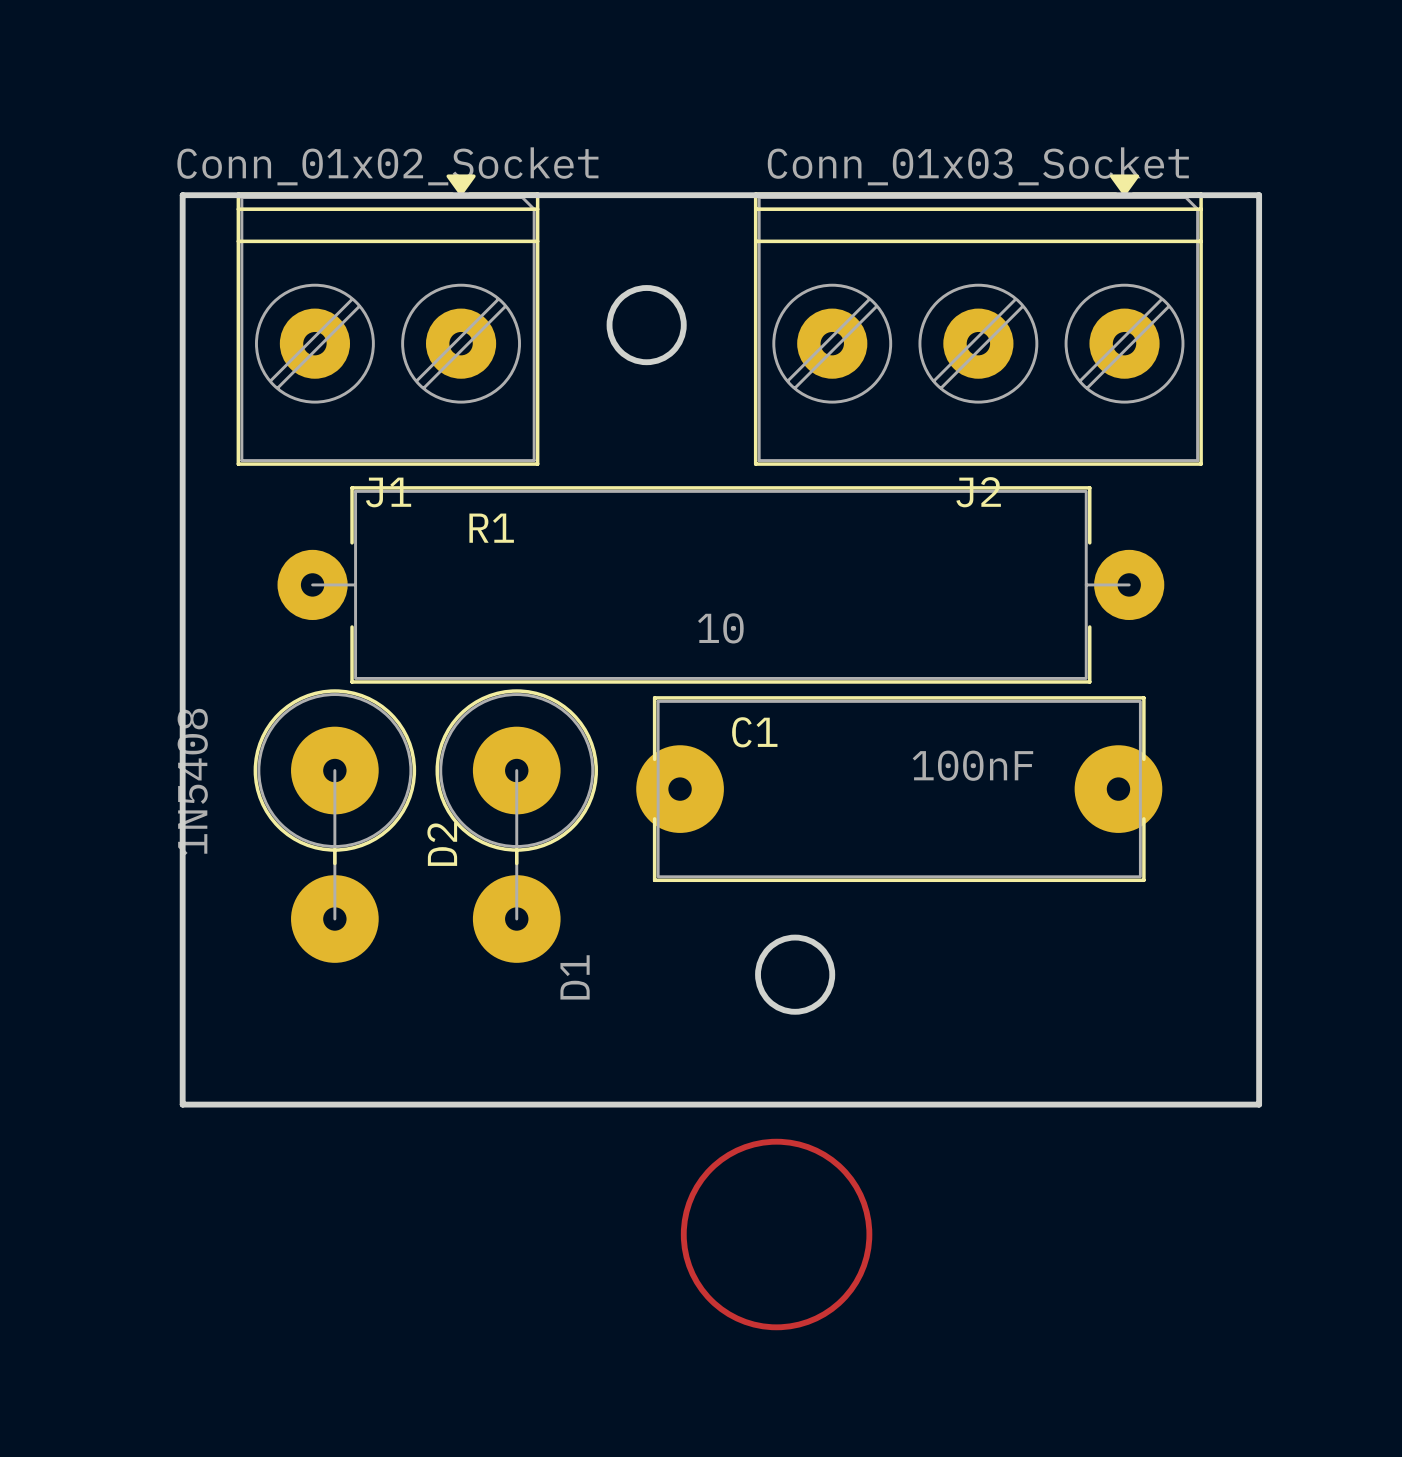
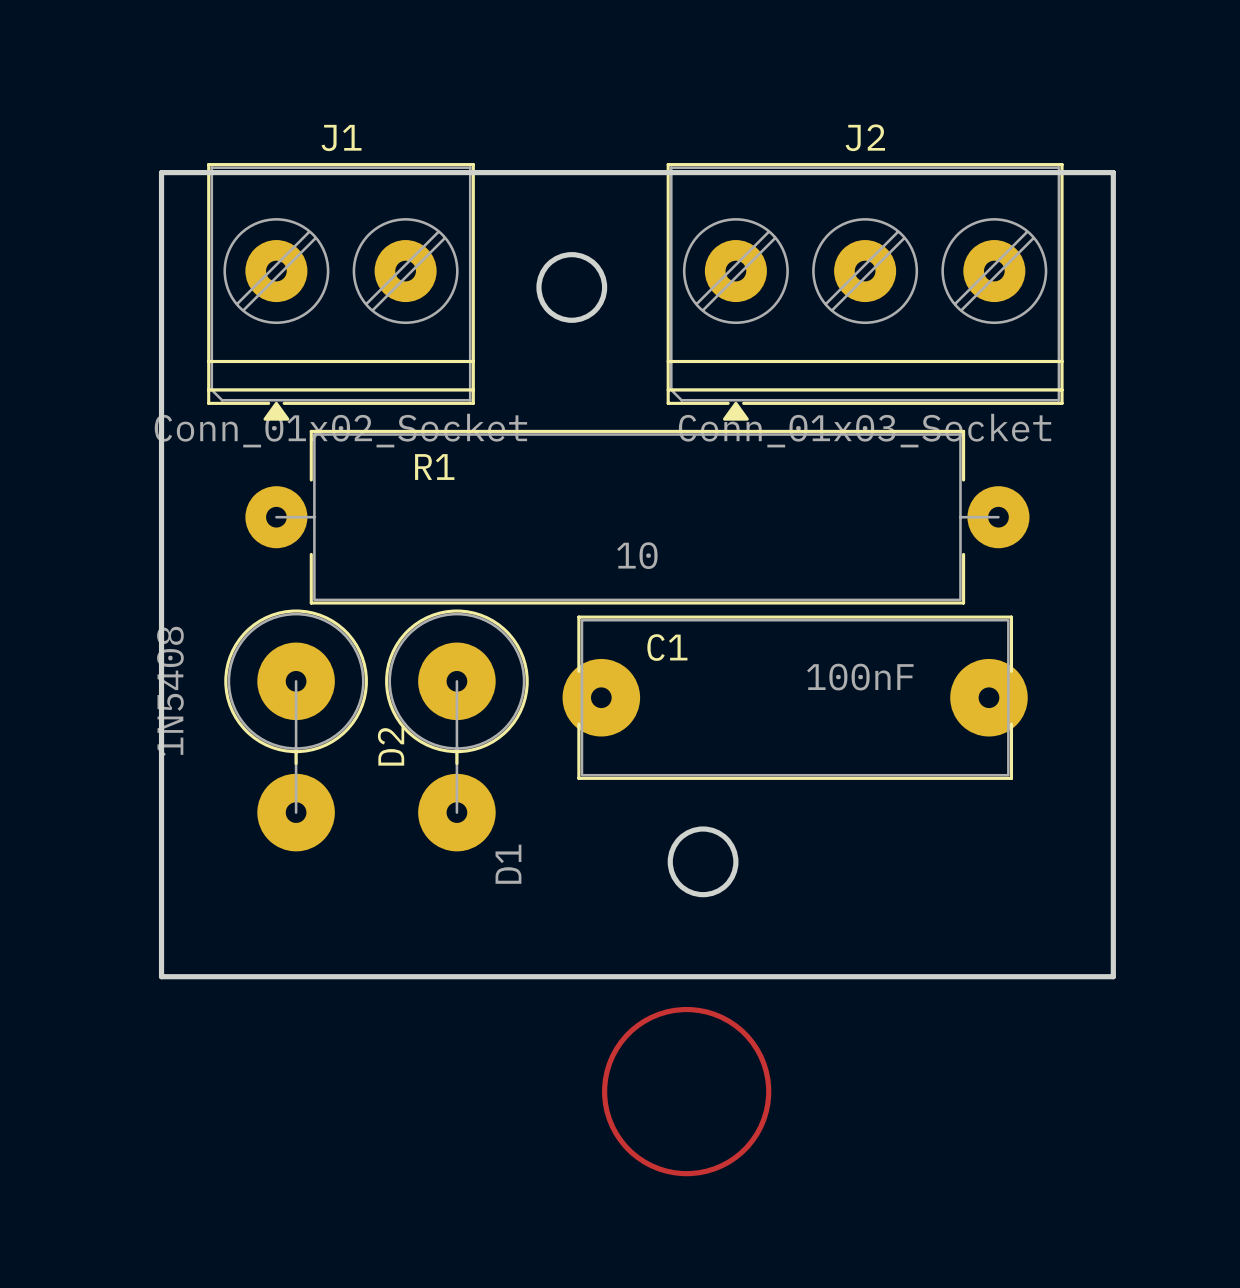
J1 rotation: 0° (388, 320) -> 180° (341, 291)
J2 rotation: 0° (978, 320) -> 180° (865, 291)

